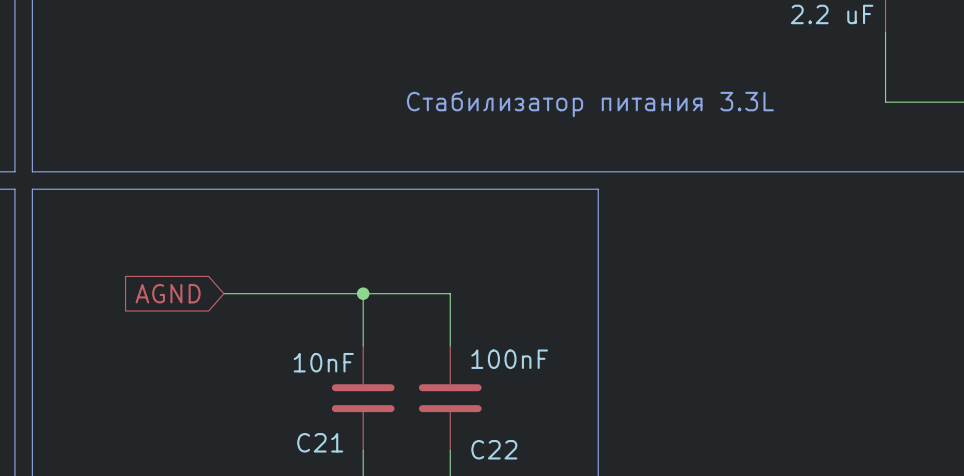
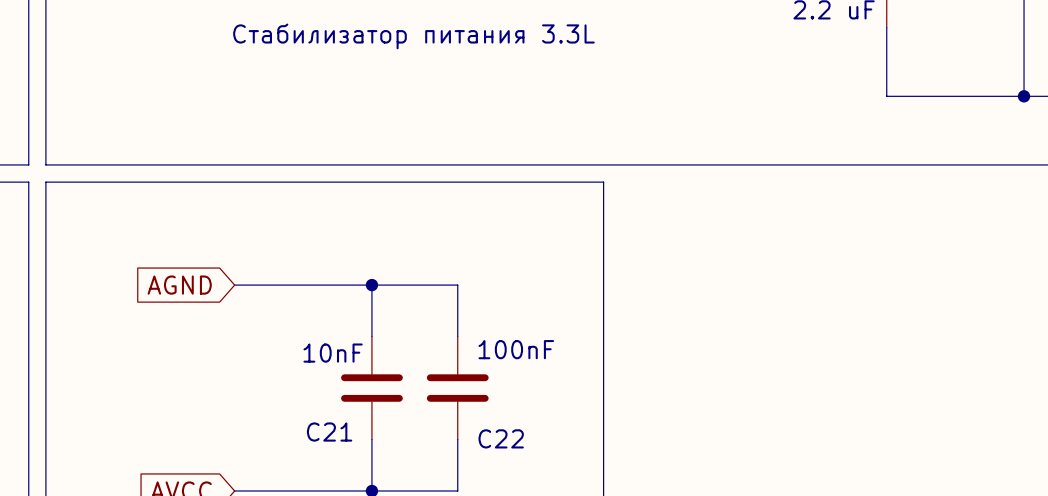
text position: Стабилизатор питания 3.3L (590, 104) -> Стабилизатор питания 3.3L (413, 36)

